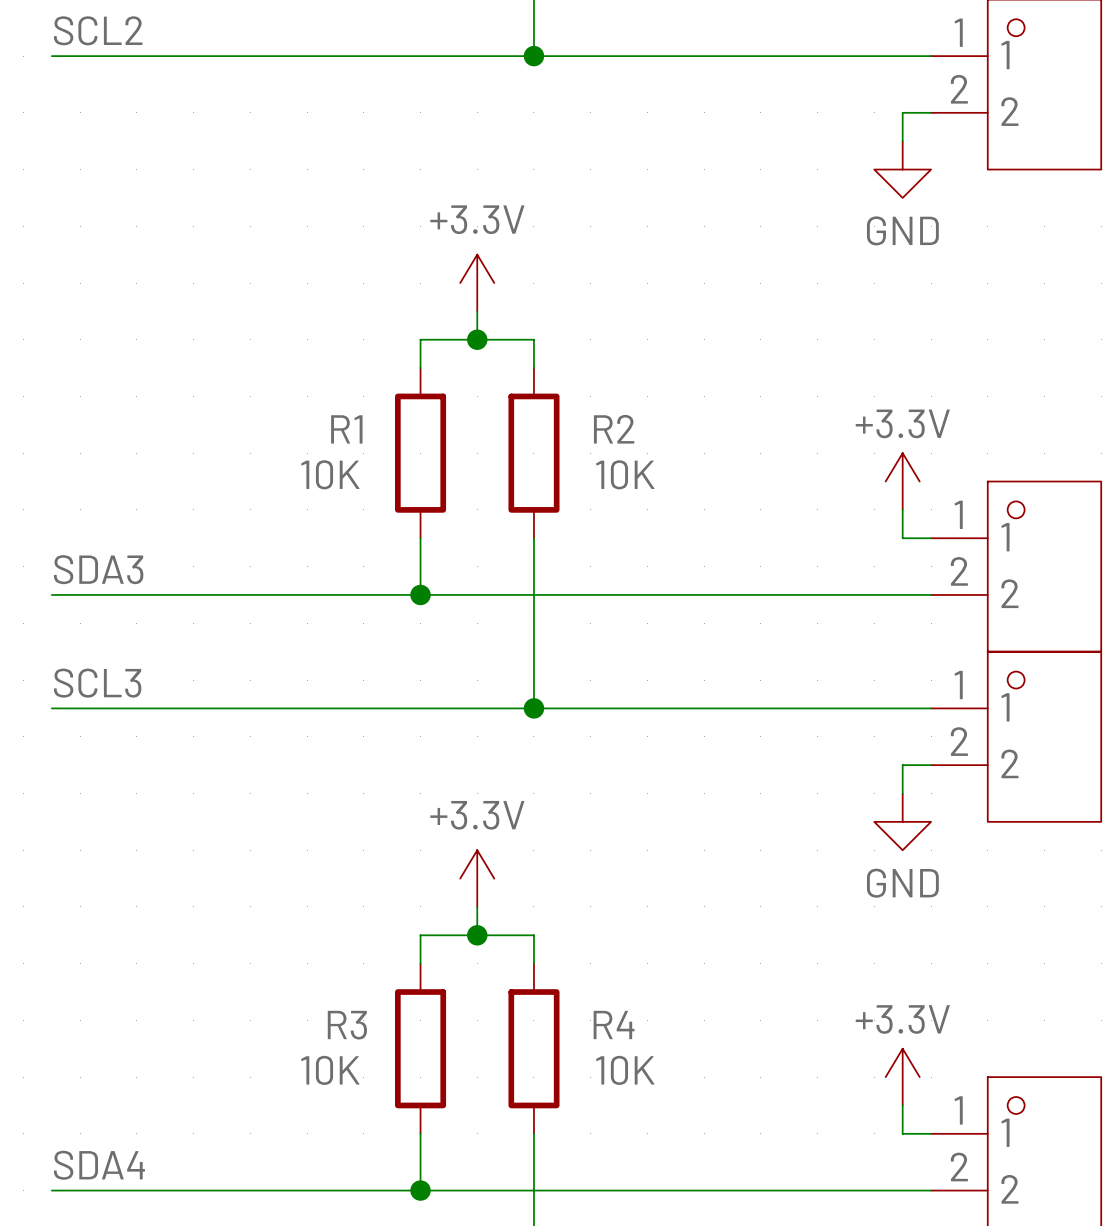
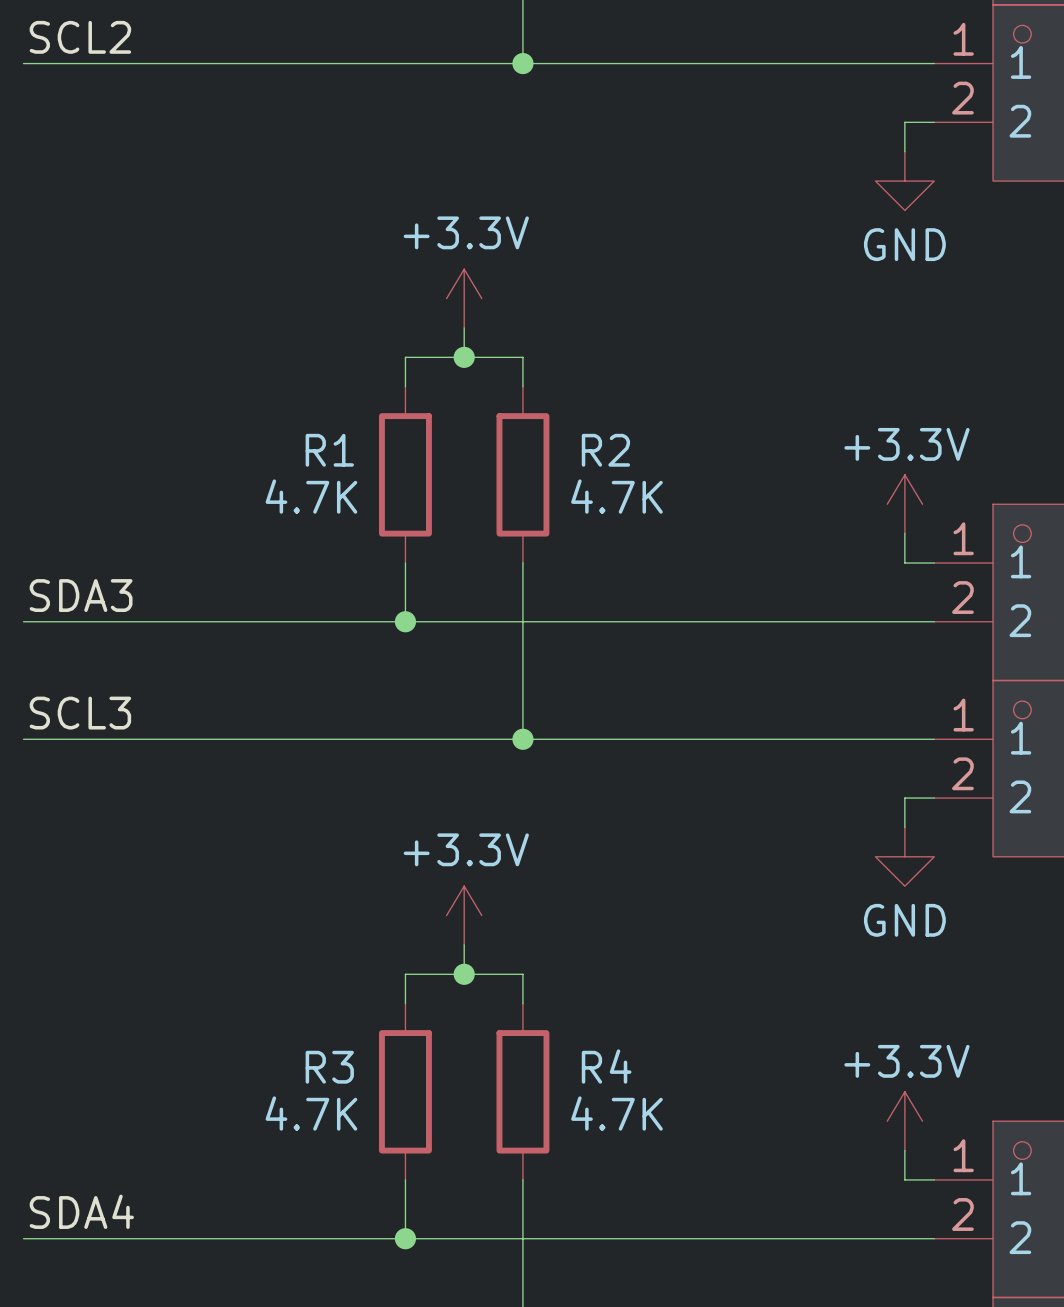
R1 value: 10K (330, 474) -> 4.7K (311, 496)
R2 value: 10K (625, 474) -> 4.7K (616, 496)
R3 value: 10K (330, 1070) -> 4.7K (311, 1113)
R4 value: 10K (625, 1070) -> 4.7K (616, 1113)

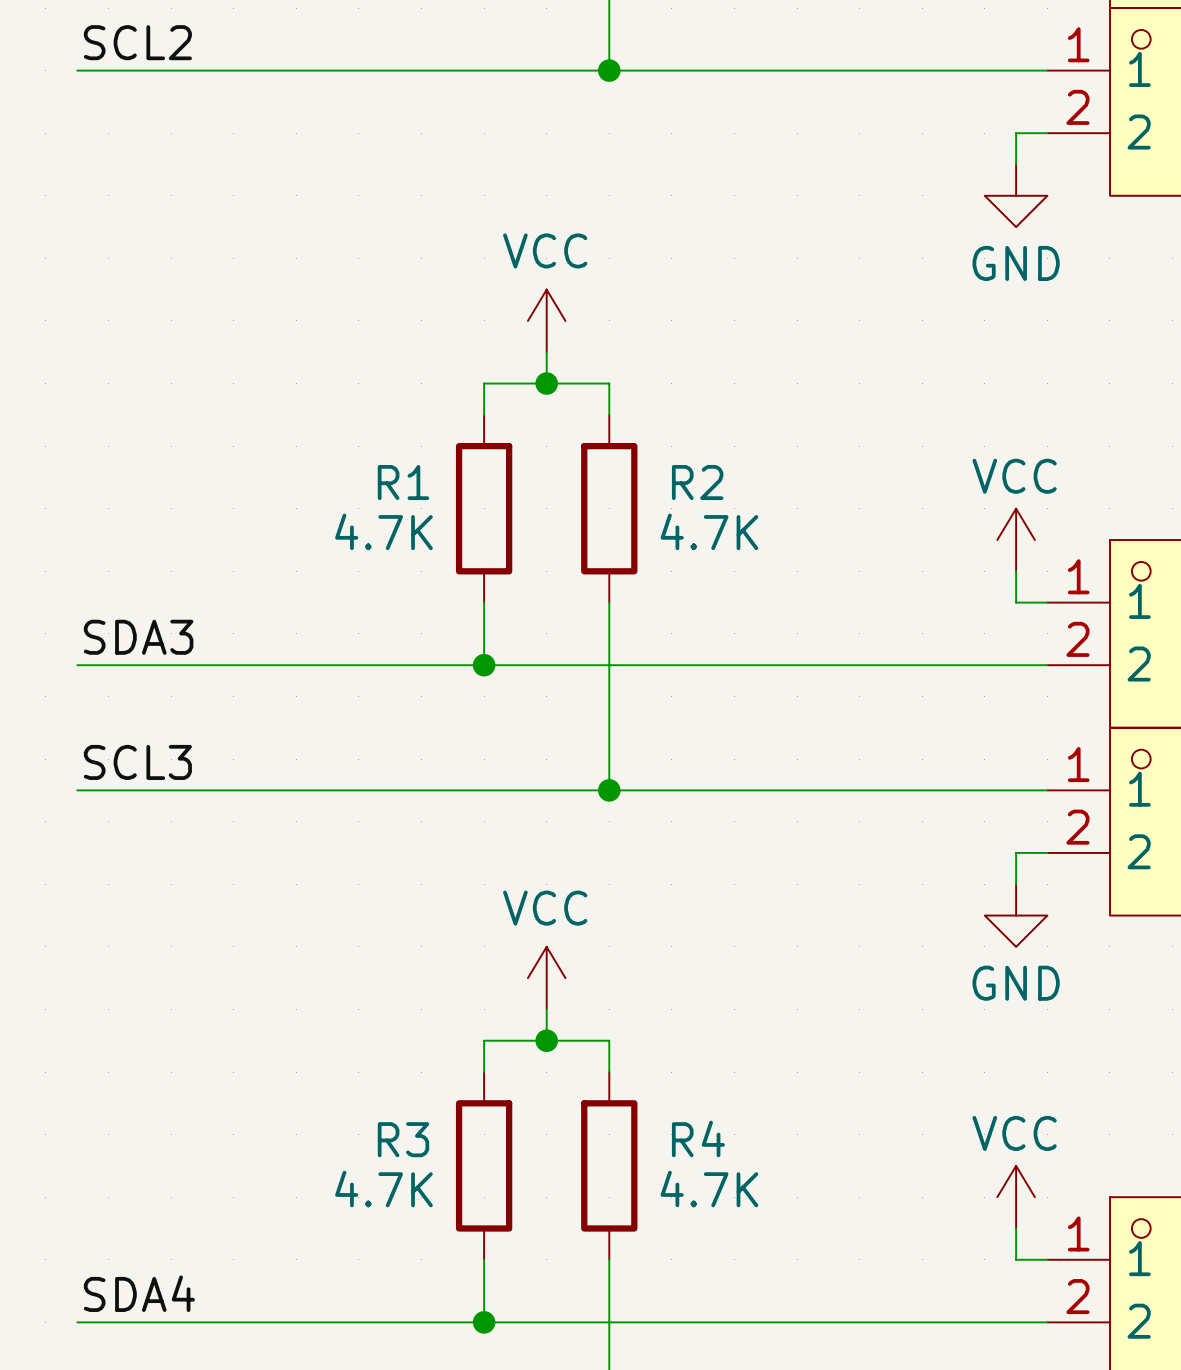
power symbol: +3.3V (464, 298) -> VCC (546, 320)
power symbol: +3.3V (904, 504) -> VCC (1016, 540)
power symbol: +3.3V (464, 915) -> VCC (546, 978)
power symbol: +3.3V (904, 1121) -> VCC (1016, 1197)

